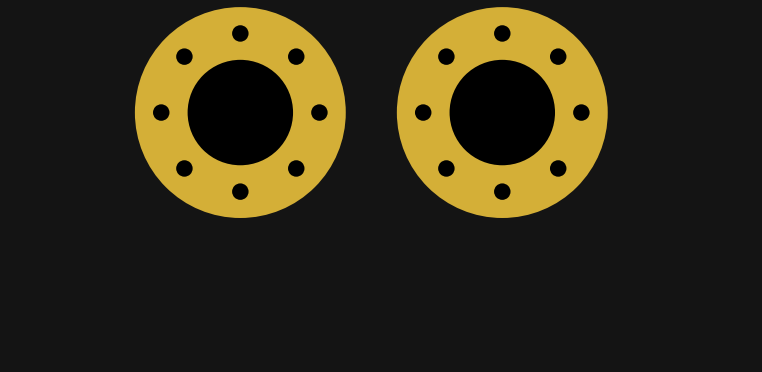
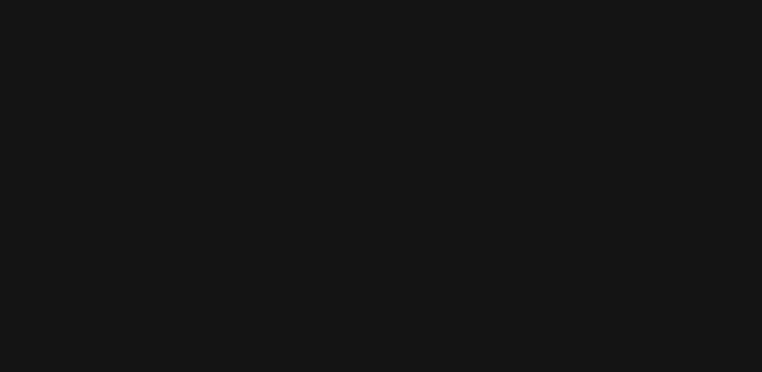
part: (240, 112) -> none
part: (502, 112) -> none

